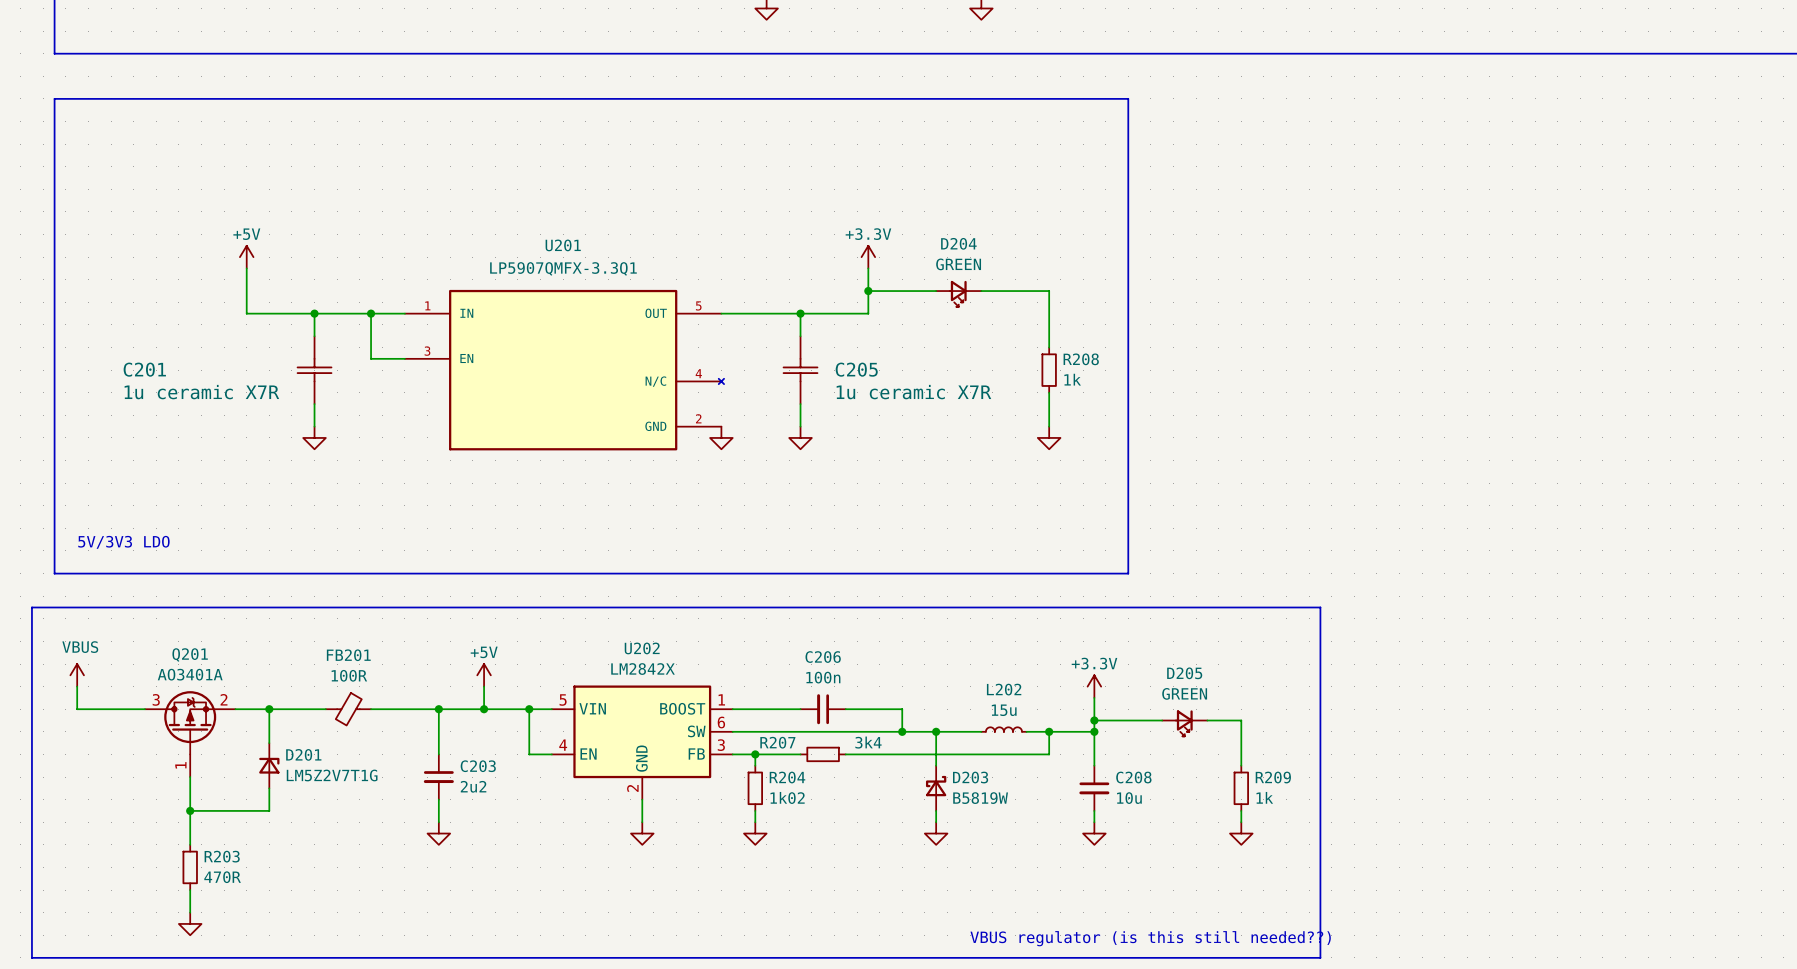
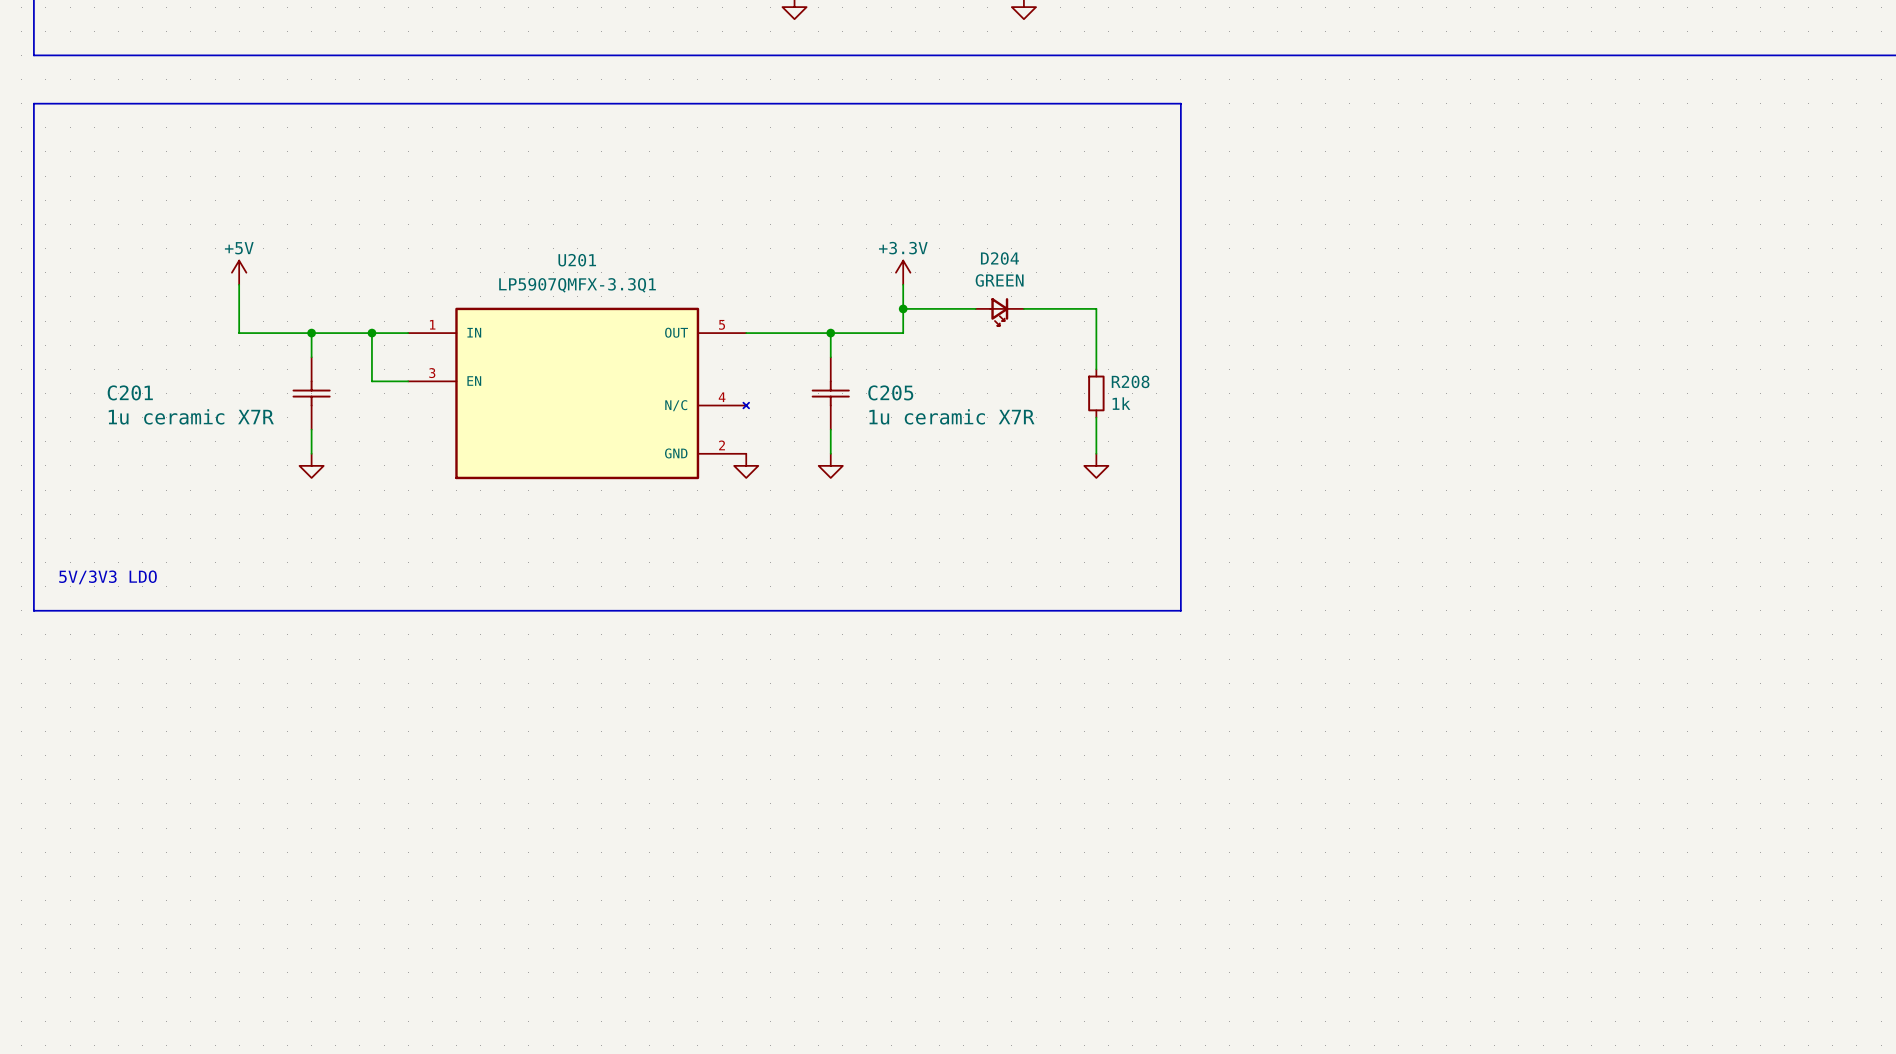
line: (31, 607) (31, 957) (1320, 957) (1320, 607) (31, 607) -> none
power symbol: VBUS (77, 675) -> none
power symbol: +5V (484, 675) -> none
wire: (77, 686) (77, 709) (144, 709) -> none
wire: (484, 686) (484, 709) -> none
power symbol: +3.3V (1094, 686) -> none
wire: (1094, 697) (1094, 765) -> none
wire: (235, 709) (325, 709) -> none
wire: (269, 709) (269, 743) -> none
junction: (269, 709) -> none
FB201: 100R (348, 709) -> none
wire: (371, 709) (551, 709) -> none
wire: (438, 709) (438, 754) -> none
junction: (438, 709) -> none
junction: (484, 709) -> none
wire: (529, 709) (529, 754) (551, 754) -> none
junction: (529, 709) -> none
wire: (732, 709) (800, 709) -> none
C206: 100n (823, 709) -> none
wire: (845, 709) (902, 709) (902, 731) -> none
wire: (1094, 720) (1162, 720) -> none
junction: (1094, 720) -> none
wire: (1207, 720) (1241, 720) (1241, 765) -> none
D205: GREEN (1184, 723) -> none
L202: 15u (1003, 729) -> none
wire: (732, 731) (981, 731) -> none
junction: (902, 731) -> none
wire: (936, 731) (936, 765) -> none
junction: (936, 731) -> none
wire: (1026, 731) (1094, 731) -> none
wire: (1049, 731) (1049, 754) (845, 754) -> none
junction: (1049, 731) -> none
junction: (1094, 731) -> none
Q201: AO3401A (190, 734) -> none
U202: LM2842X (642, 742) -> none
wire: (732, 754) (800, 754) -> none
wire: (755, 754) (755, 765) -> none
junction: (755, 754) -> none
R207: 3k4 (823, 754) -> none
D201: LM5Z2V7T1G (269, 765) -> none
wire: (190, 777) (190, 844) -> none
C203: 2u2 (438, 777) -> none
wire: (269, 788) (269, 810) (190, 810) -> none
R204: 1k02 (755, 788) -> none
D203: B5819W (936, 788) -> none
C208: 10u (1094, 788) -> none
R209: 1k (1241, 788) -> none
wire: (438, 799) (438, 822) -> none
wire: (642, 799) (642, 822) -> none
junction: (190, 810) -> none
wire: (755, 810) (755, 822) -> none
wire: (936, 810) (936, 822) -> none
wire: (1094, 810) (1094, 822) -> none
wire: (1241, 810) (1241, 822) -> none
power symbol: (438, 833) -> none
power symbol: (642, 833) -> none
power symbol: (755, 833) -> none
power symbol: (936, 833) -> none
power symbol: (1094, 833) -> none
power symbol: (1241, 833) -> none
R203: 470R (190, 867) -> none
wire: (190, 890) (190, 912) -> none
power symbol: (190, 923) -> none
text: VBUS regulator (is this still needed??) (1150, 938) -> none

